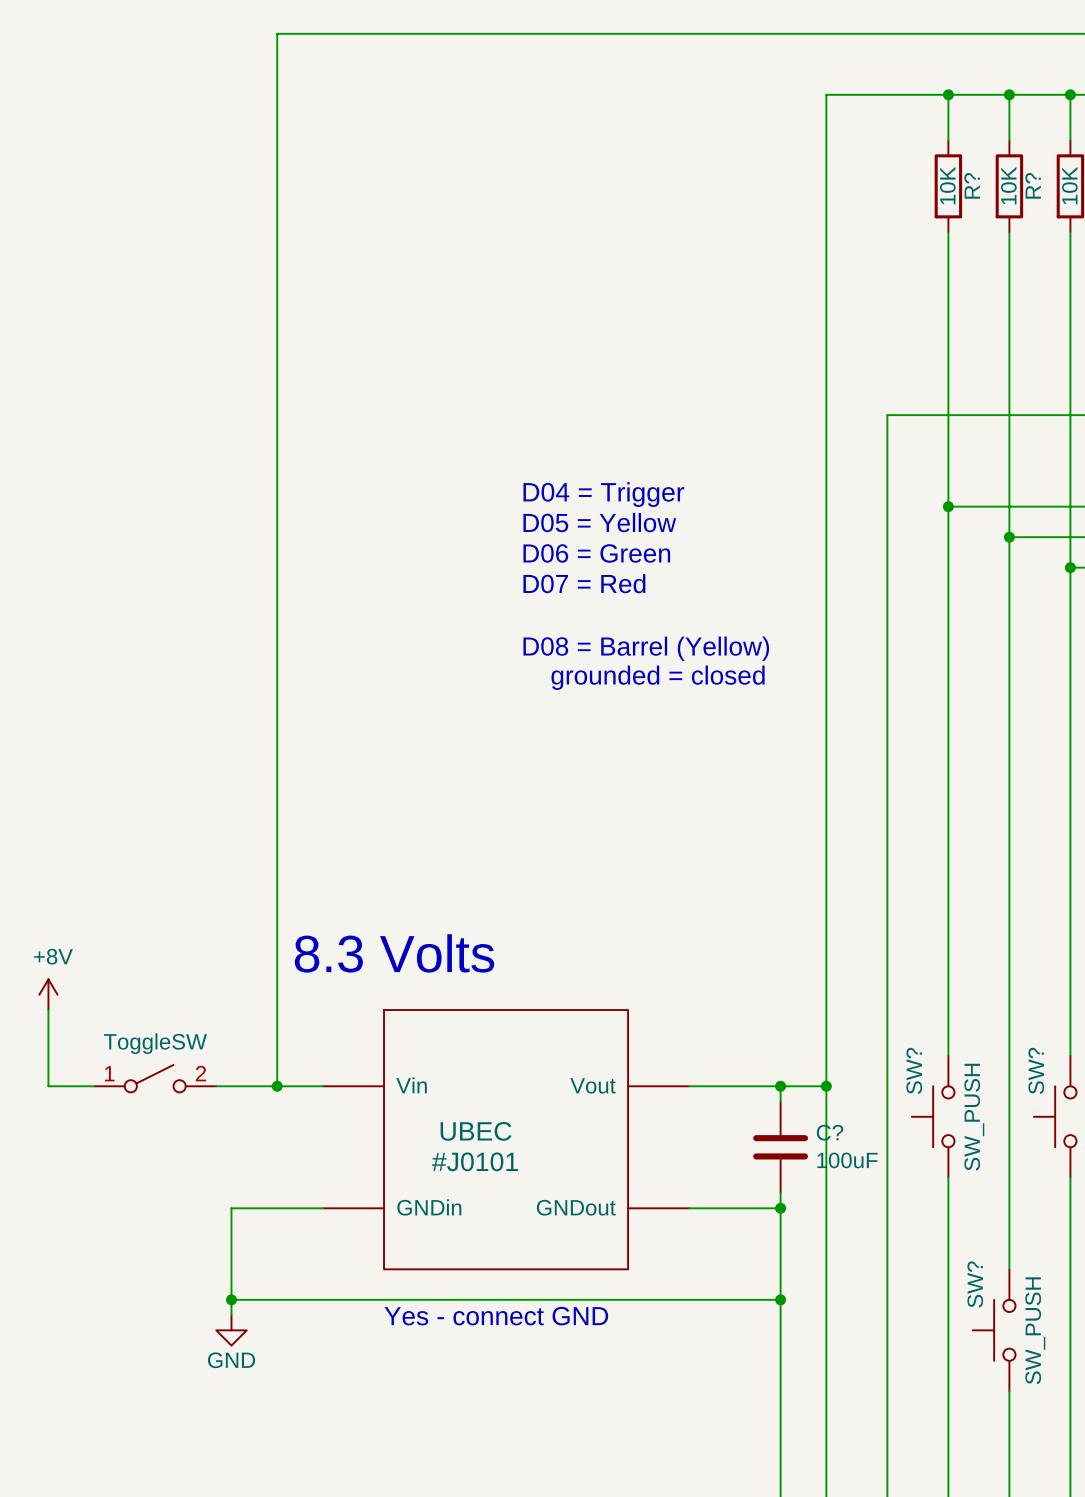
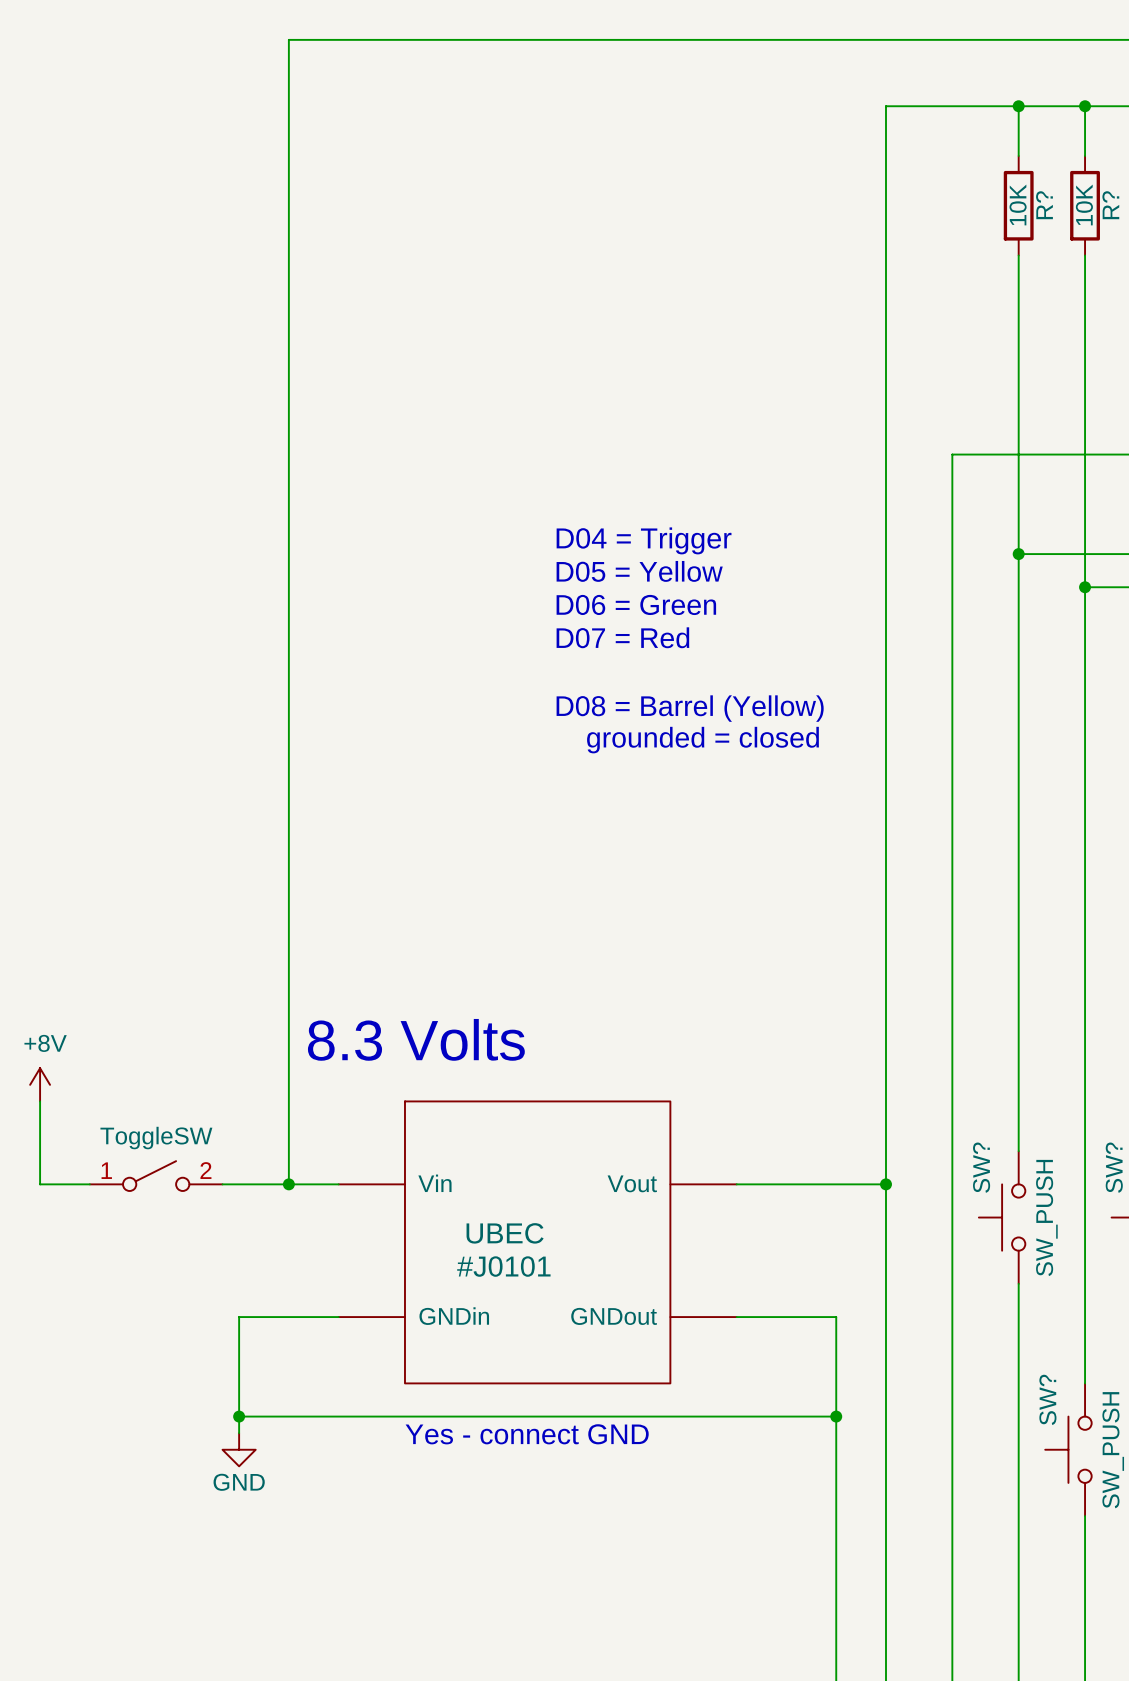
wire: (780, 1086) (780, 1101) -> none
junction: (780, 1086) -> none
C?: 100uF (780, 1147) -> none
wire: (780, 1193) (780, 1208) -> none
junction: (780, 1208) -> none

